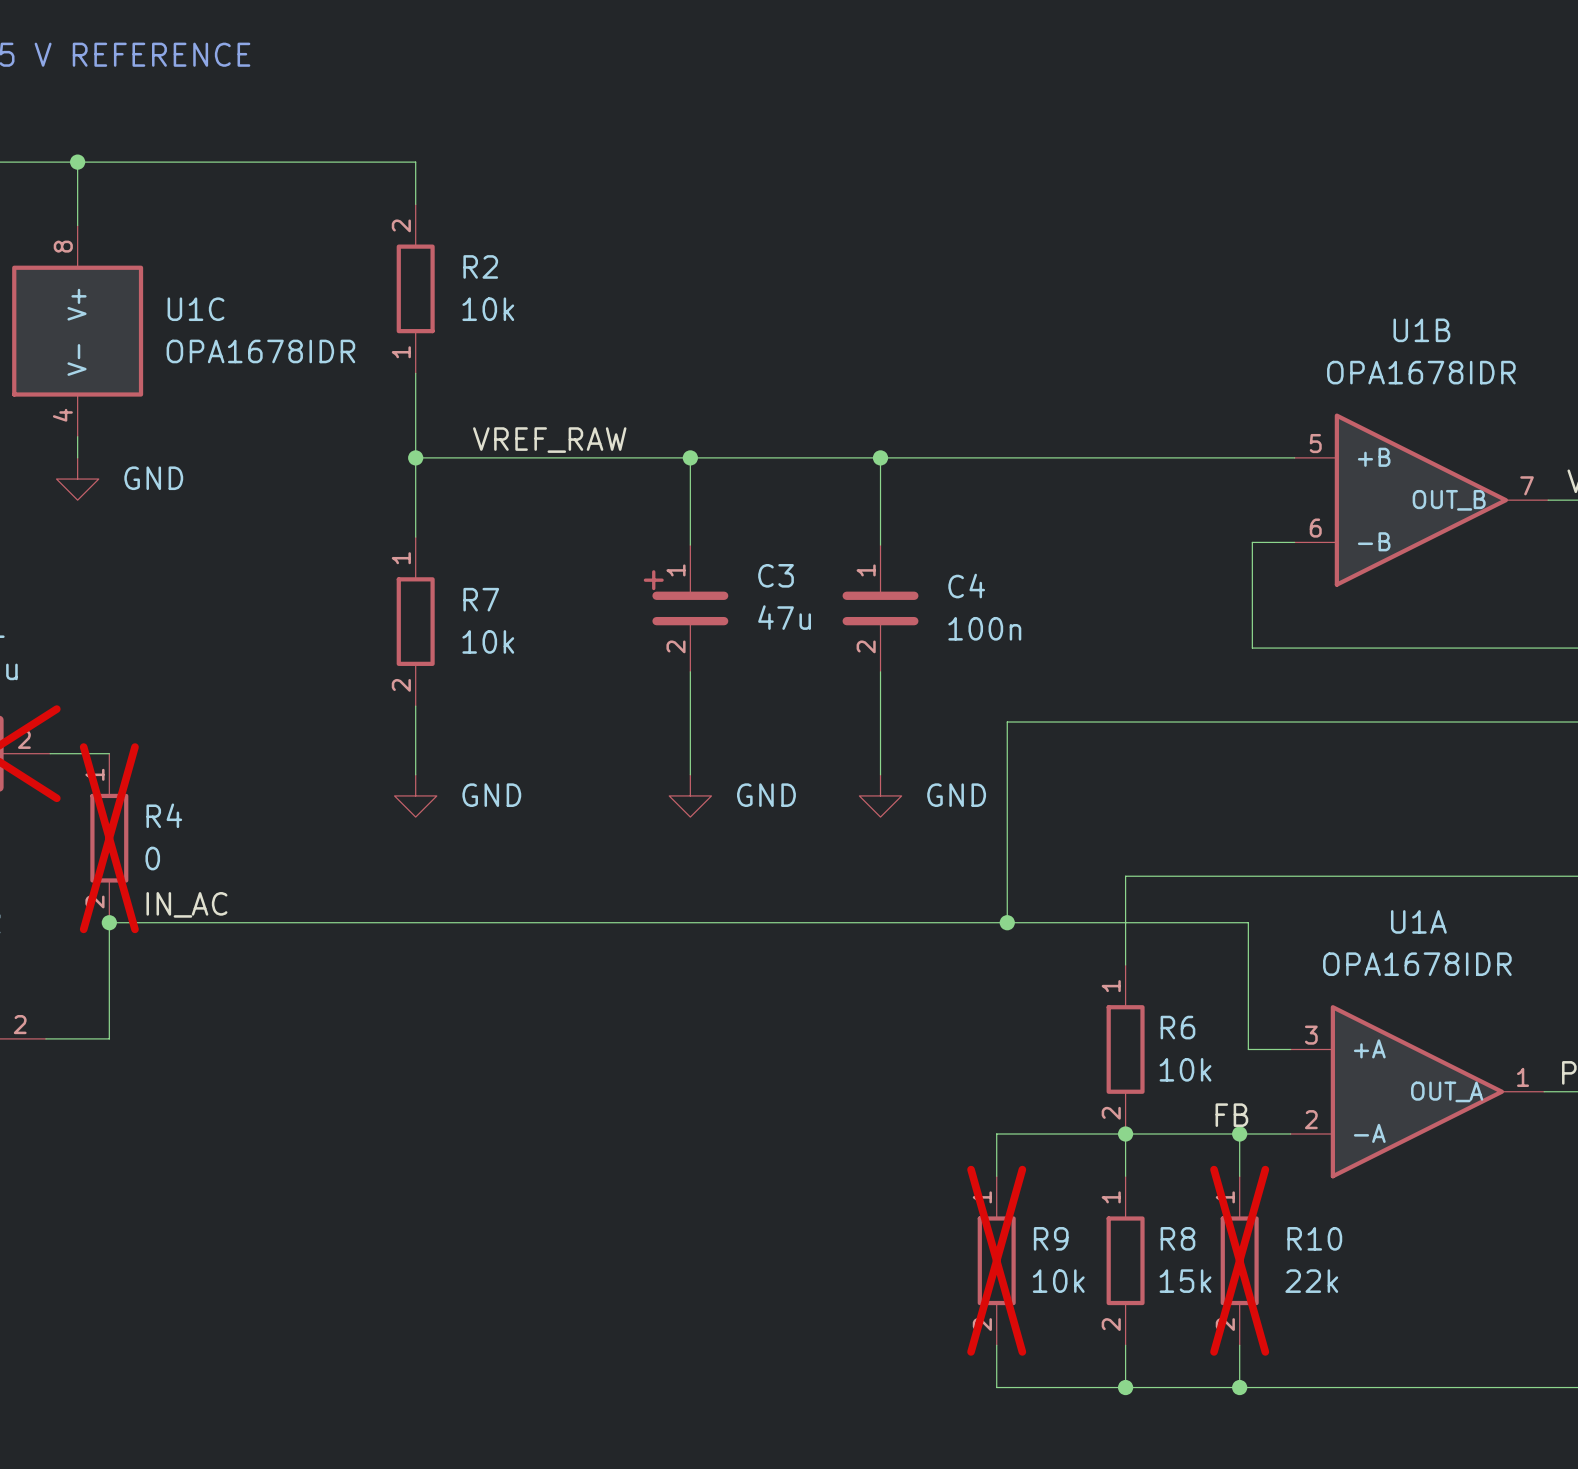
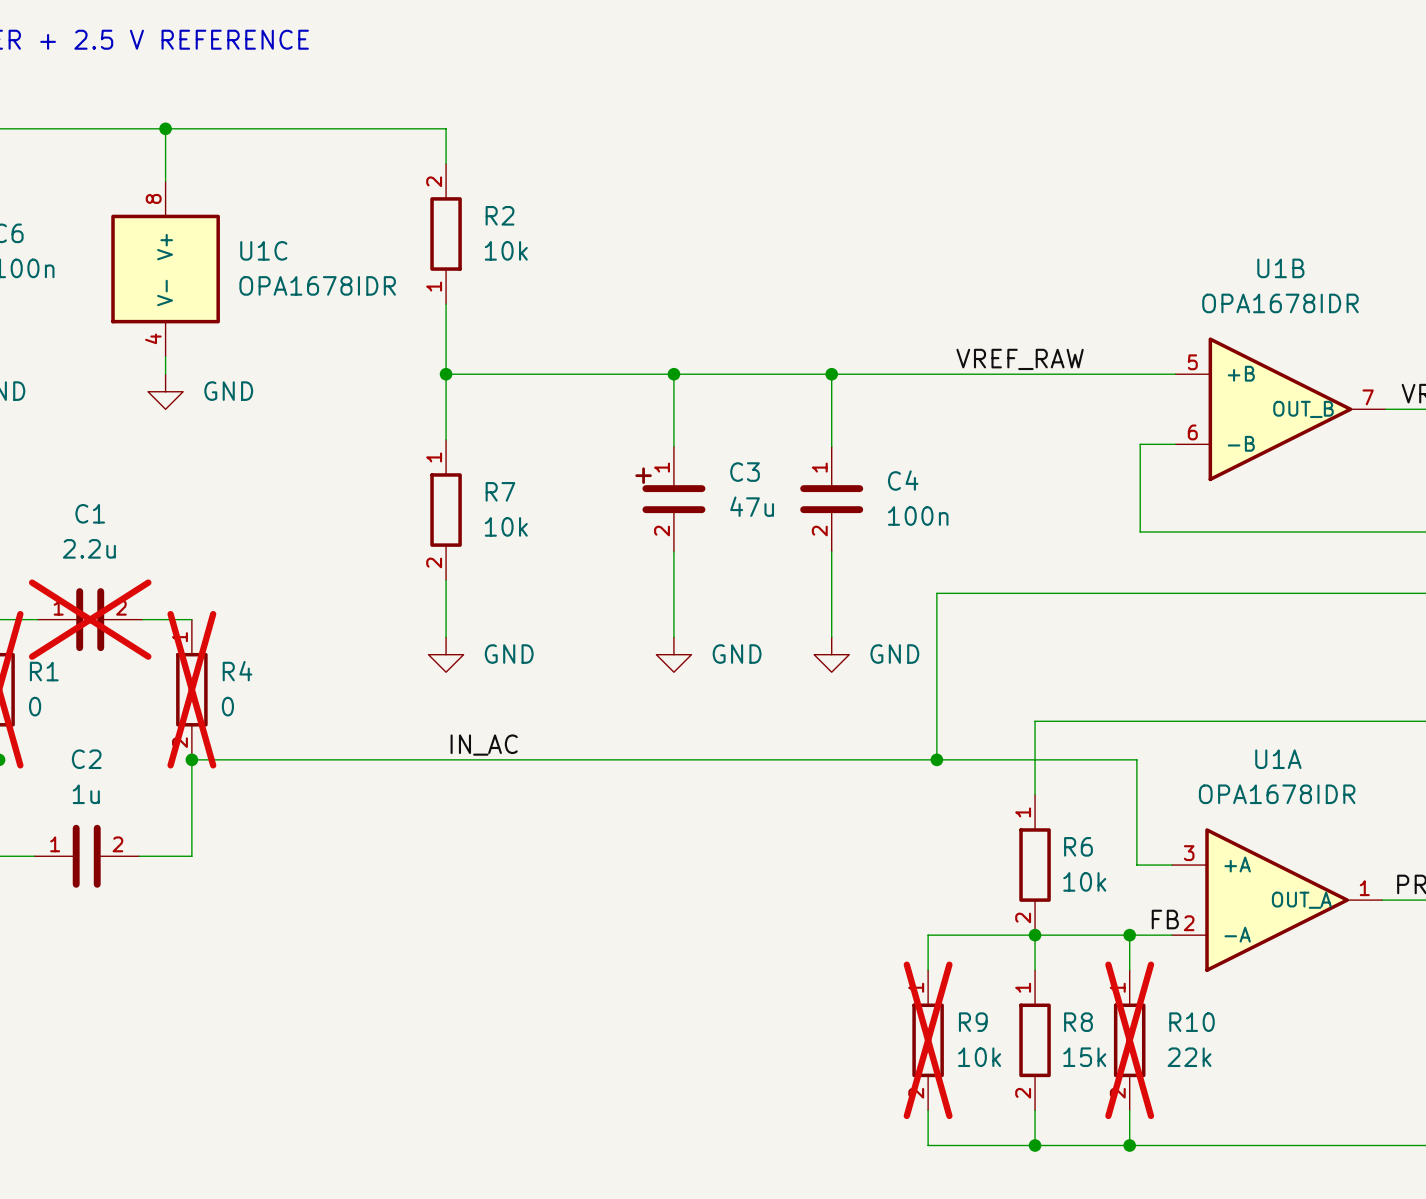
label: VREF_RAW (549, 440) -> none
label: none -> VREF_RAW (1020, 359)
label position: IN_AC (186, 904) -> IN_AC (484, 745)
label position: FB (1231, 1115) -> FB (1165, 919)

